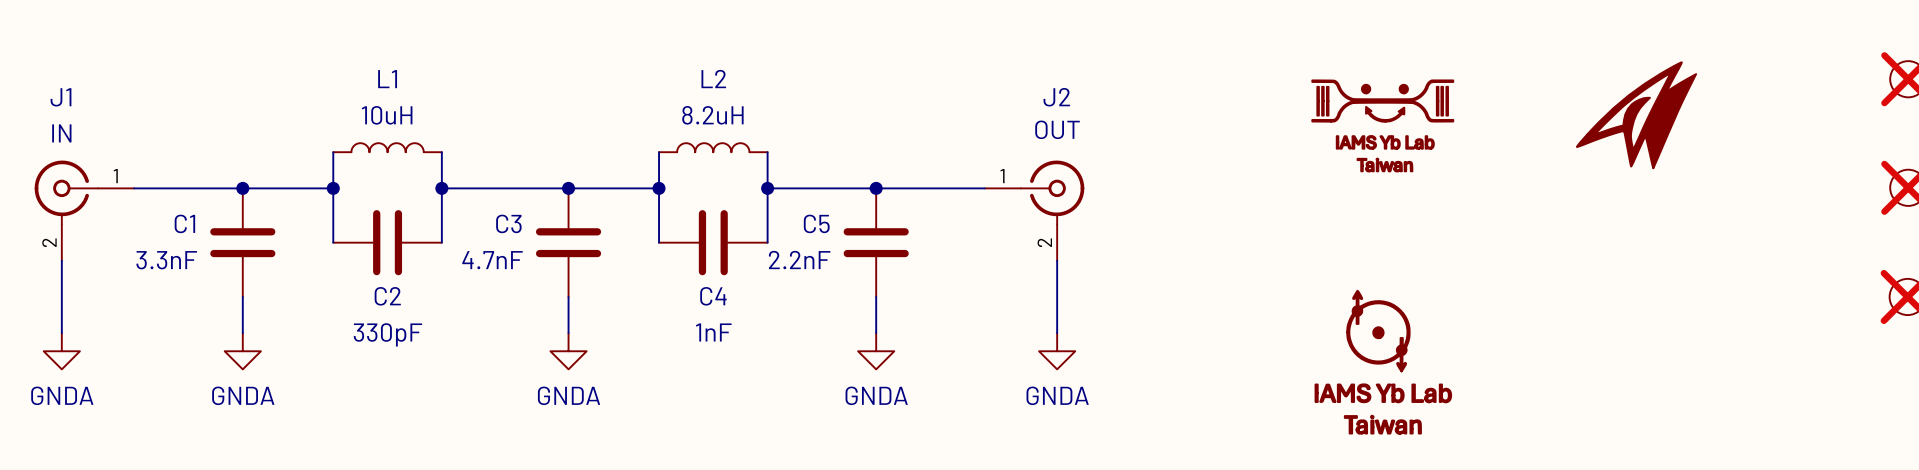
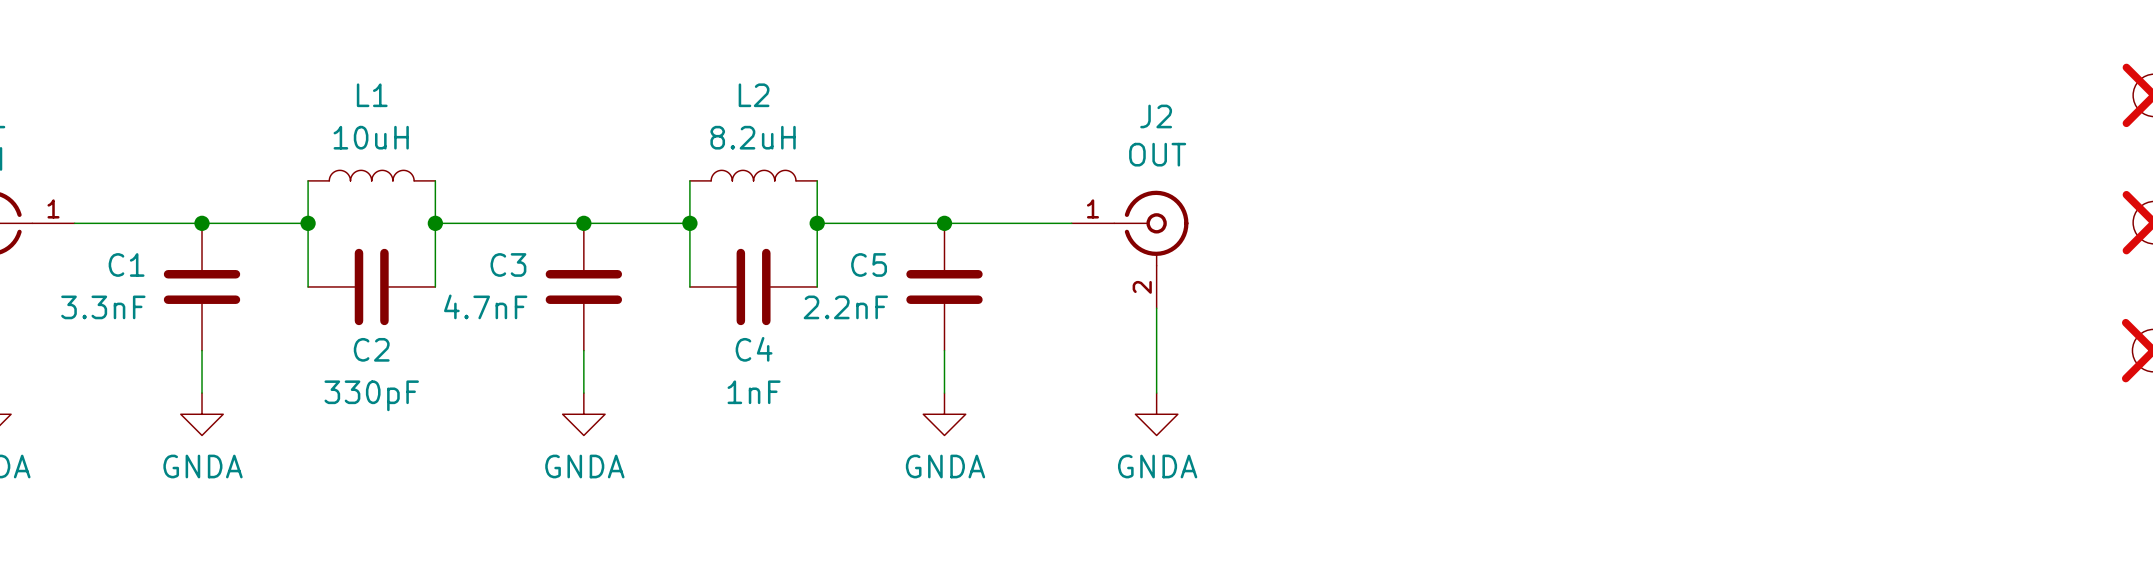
part: (1636, 115) -> none
part: (1382, 125) -> none
part: (1383, 362) -> none

